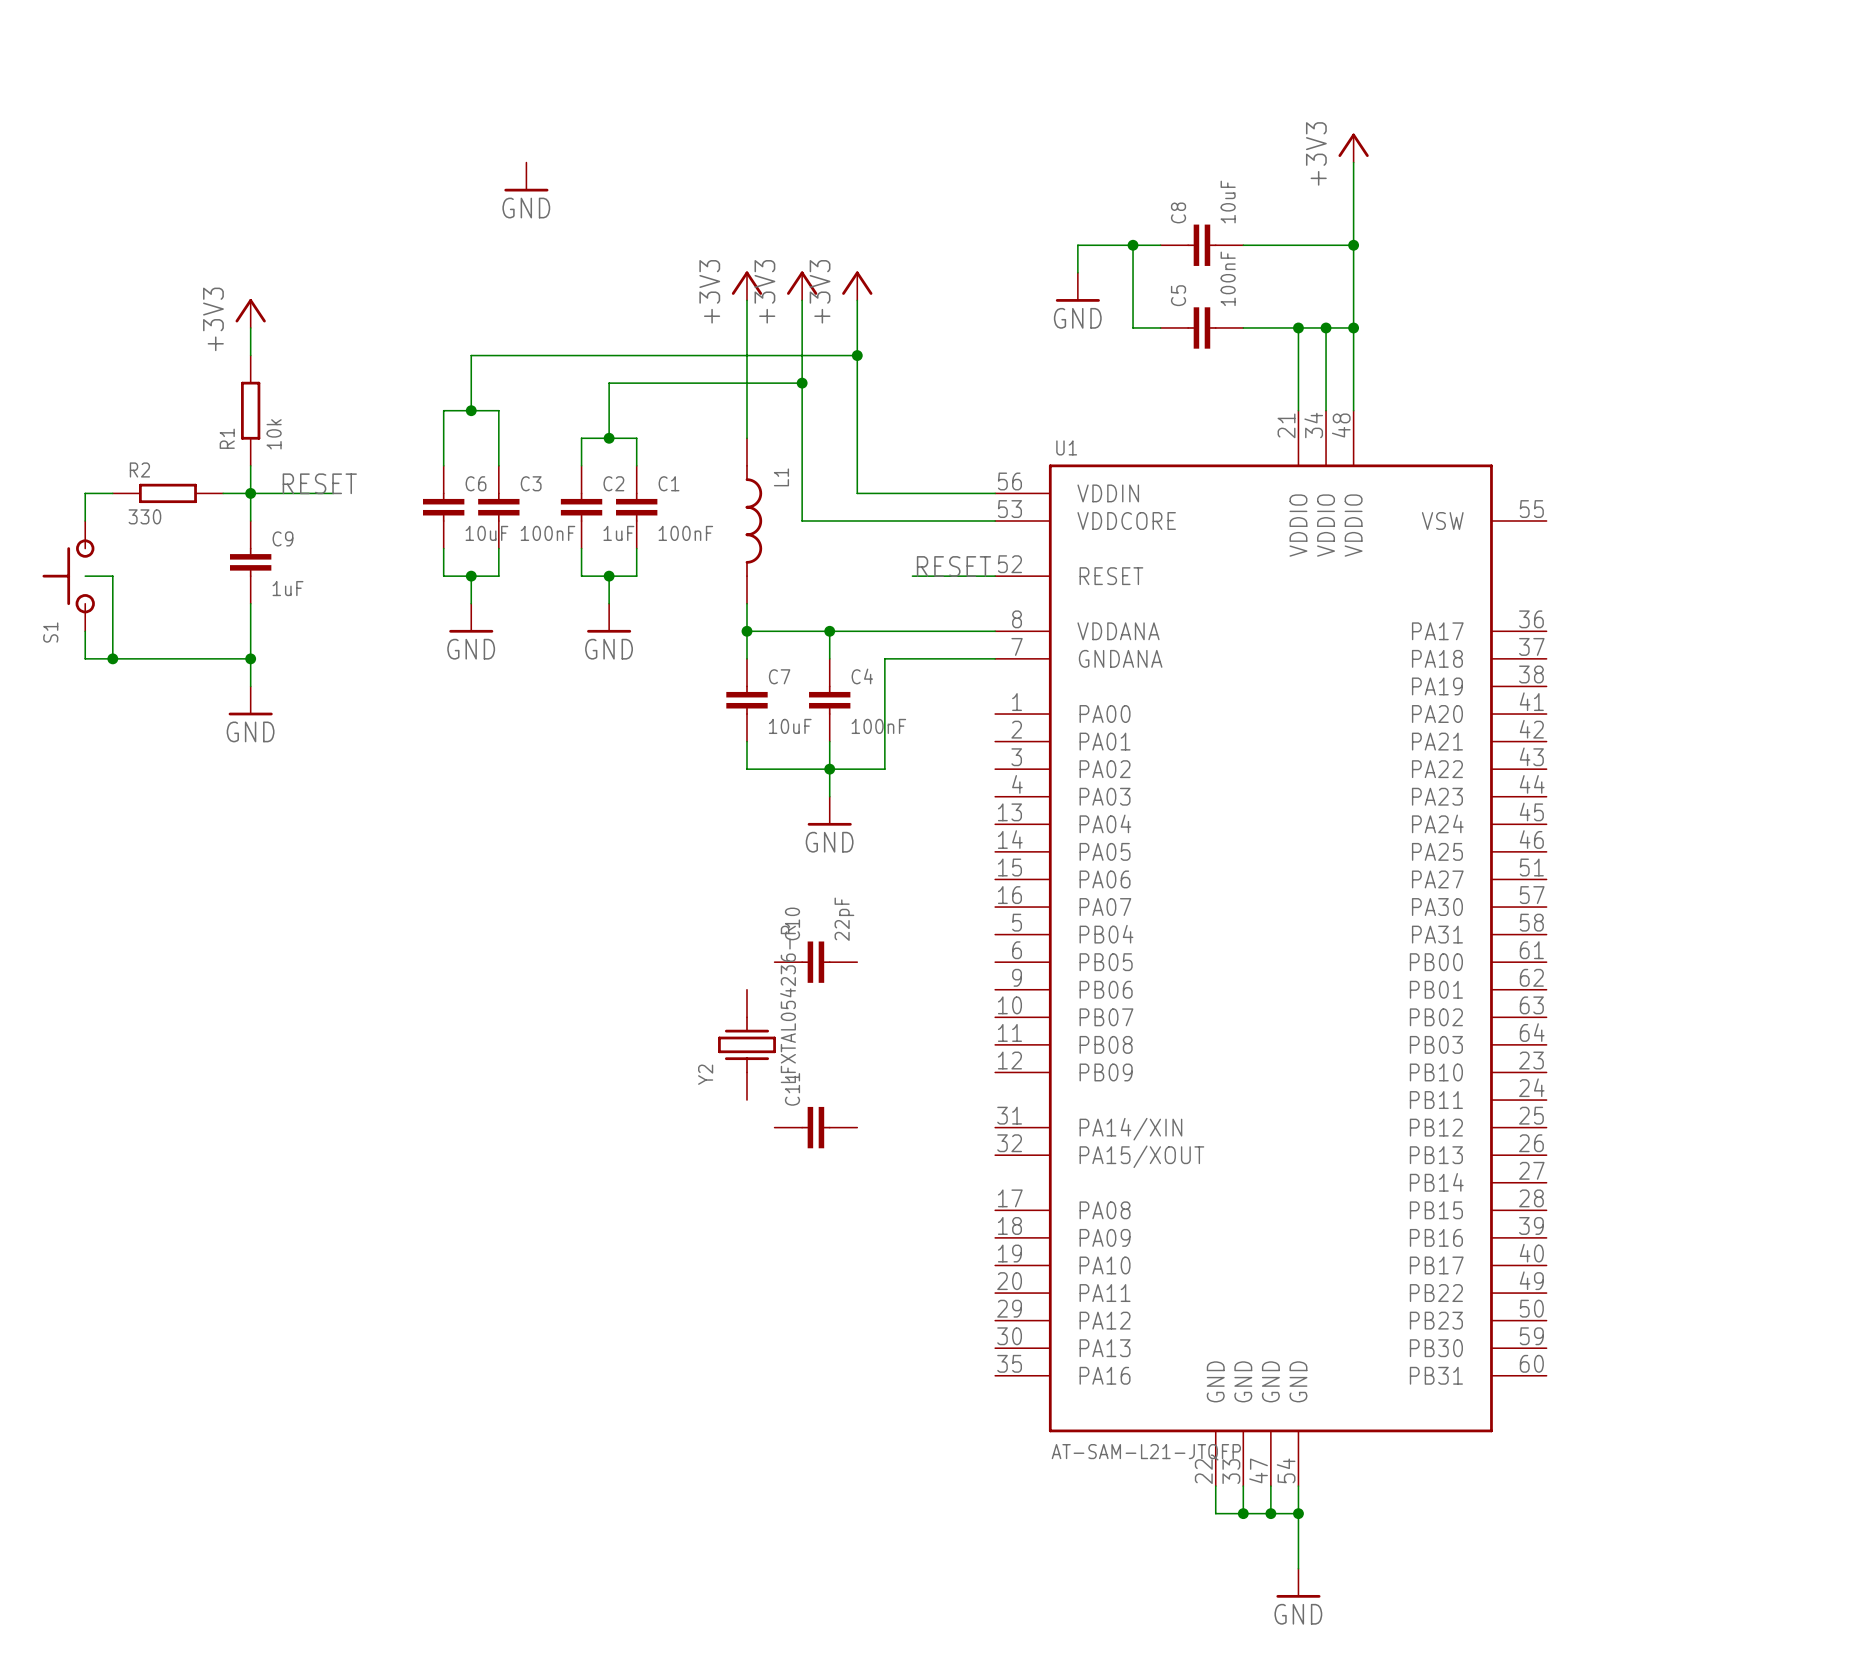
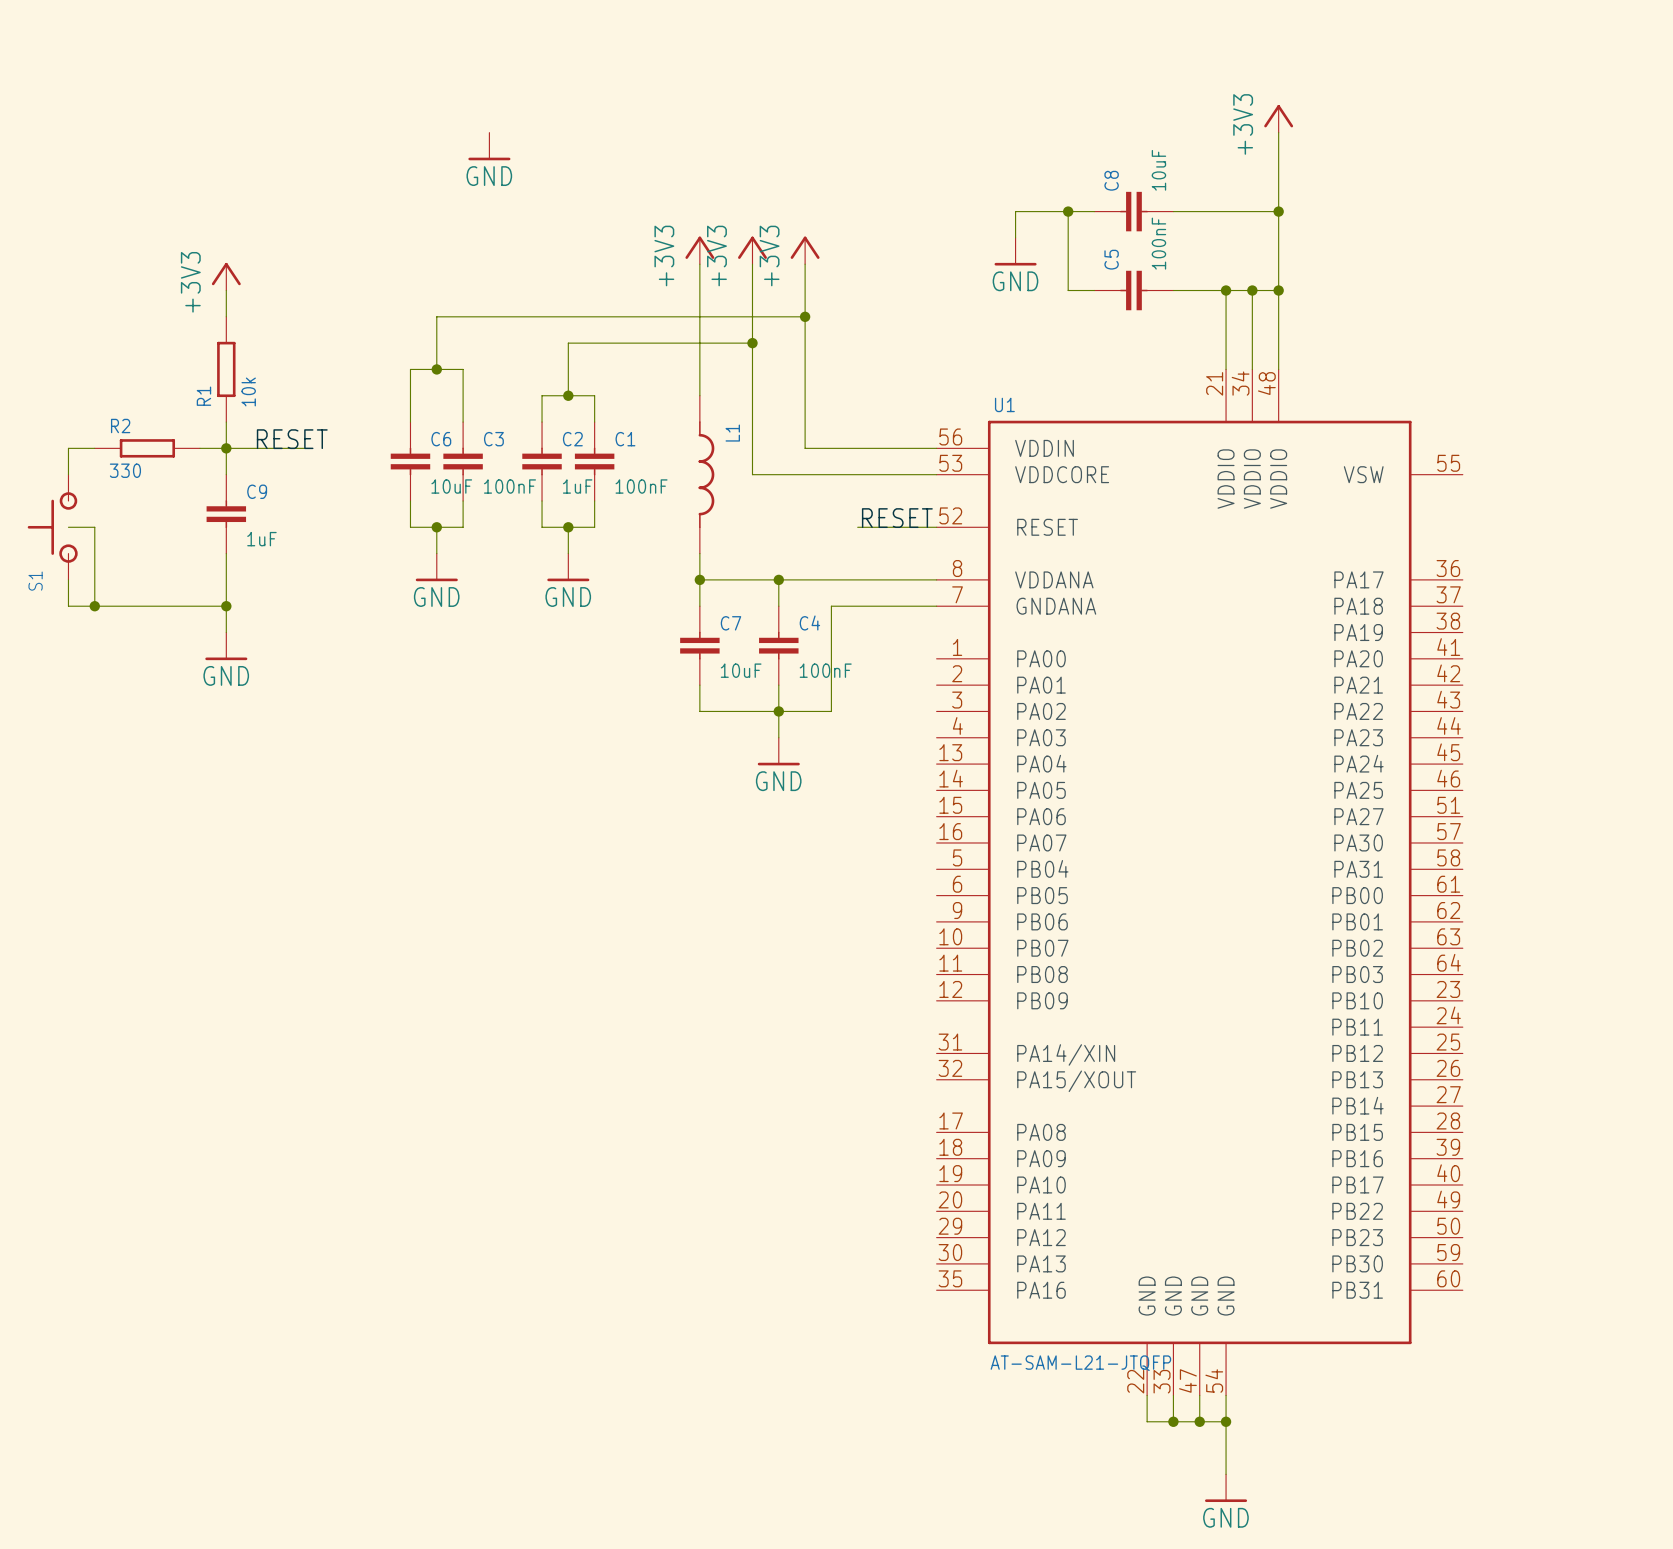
C10: 22pF (815, 962) -> none
Y2: LFXTAL054236-R (746, 1044) -> none
C11: (815, 1127) -> none

